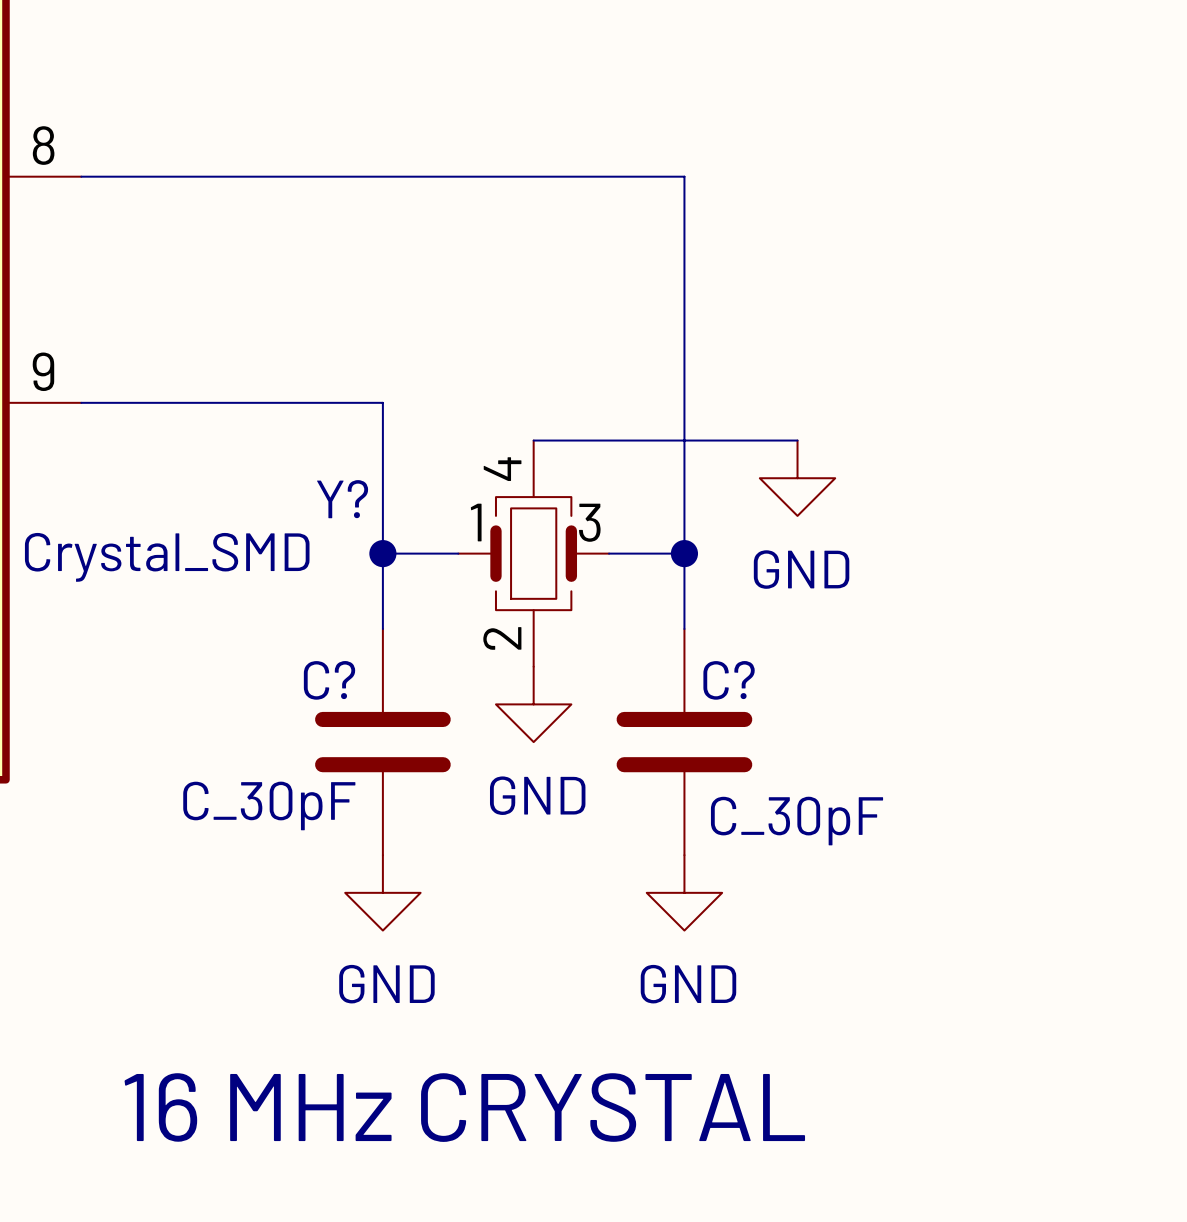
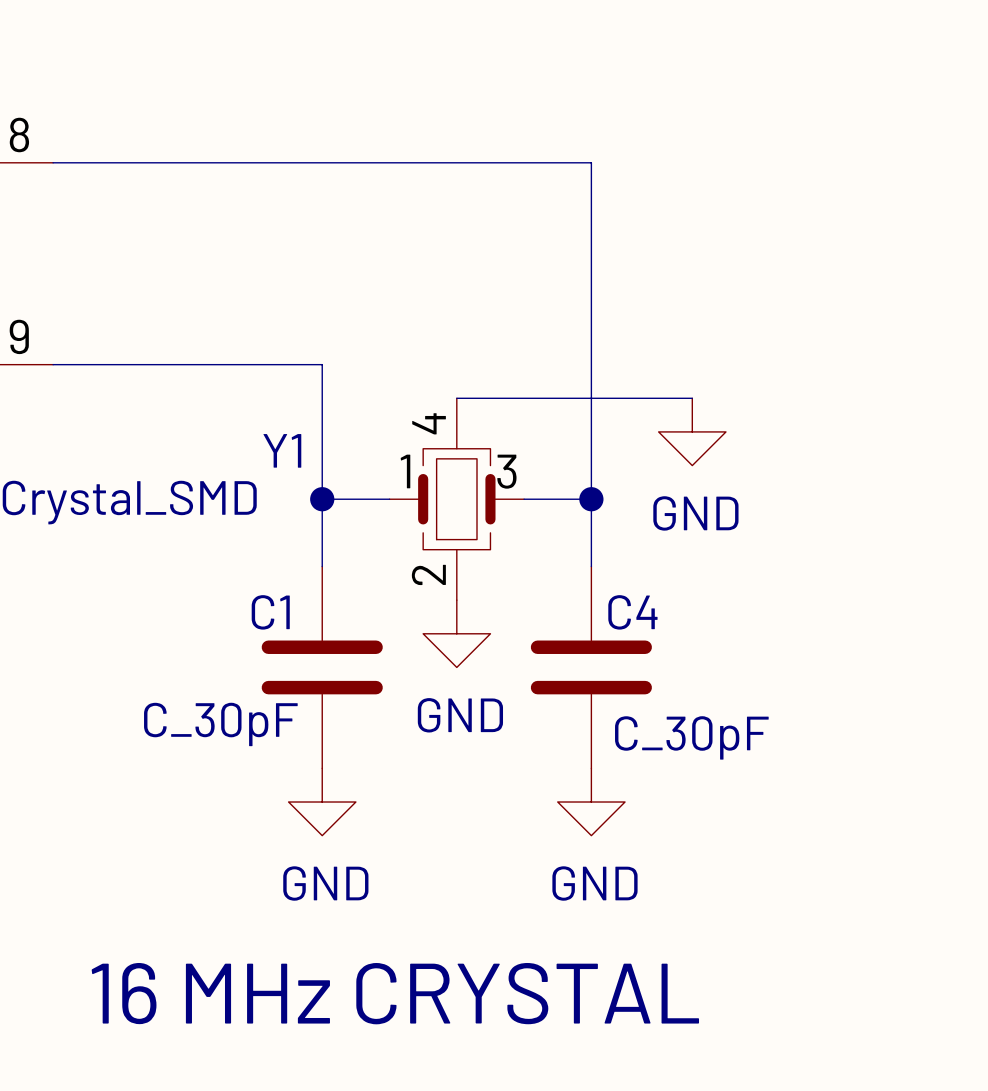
Y? name: Y? (342, 499) -> Y1 (282, 450)
C? name: C? (329, 680) -> C1 (270, 612)
C? name: C? (729, 680) -> C4 (632, 612)

